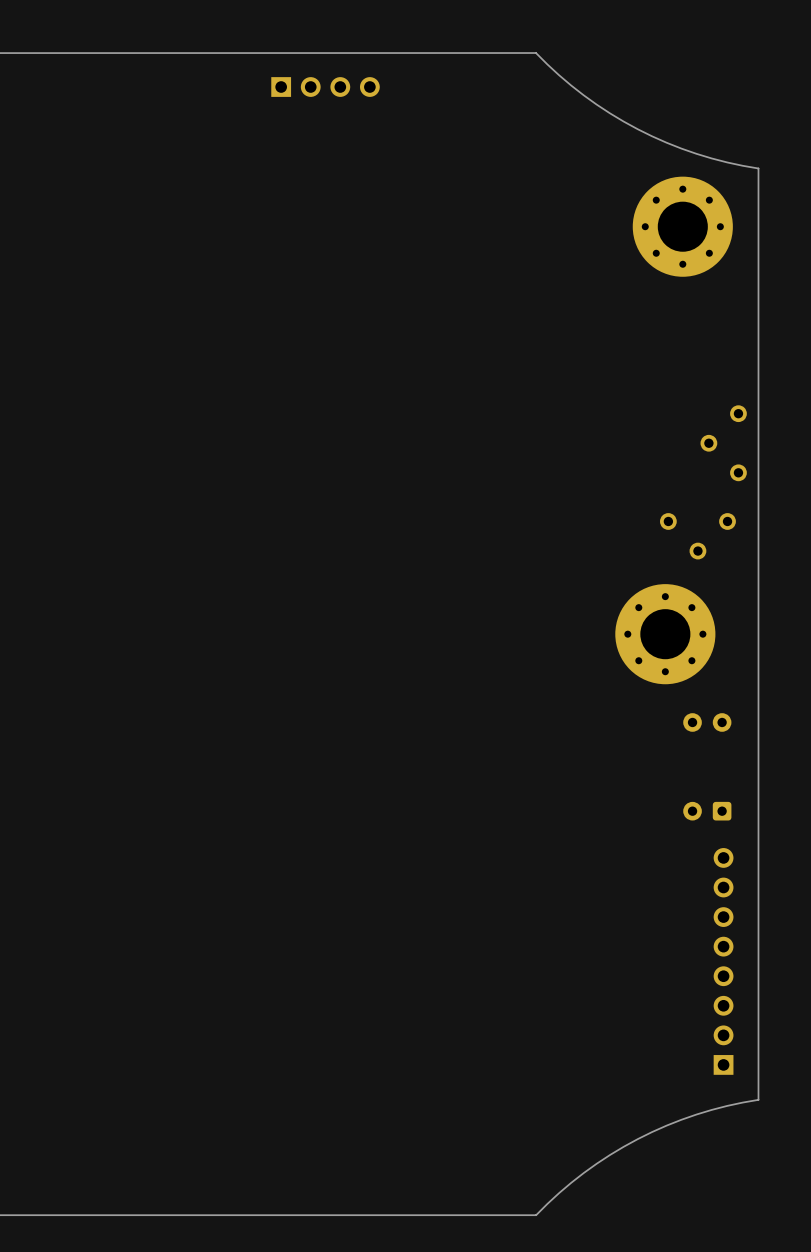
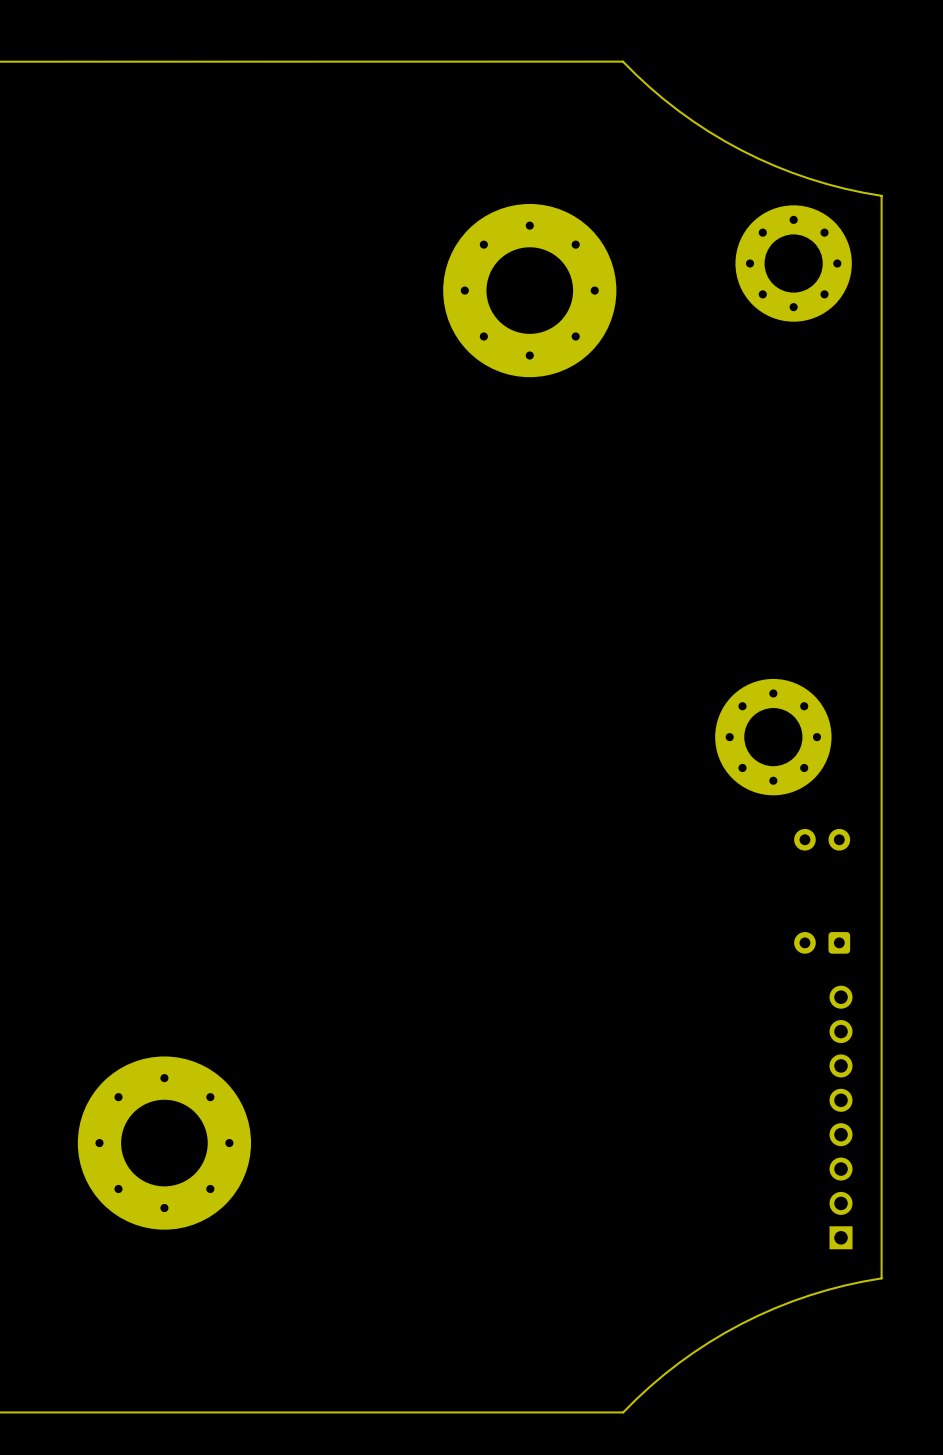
part: (325, 87) -> none
part: none -> (529, 290)
part: (723, 443) -> none
part: (697, 536) -> none
part: none -> (164, 1143)

